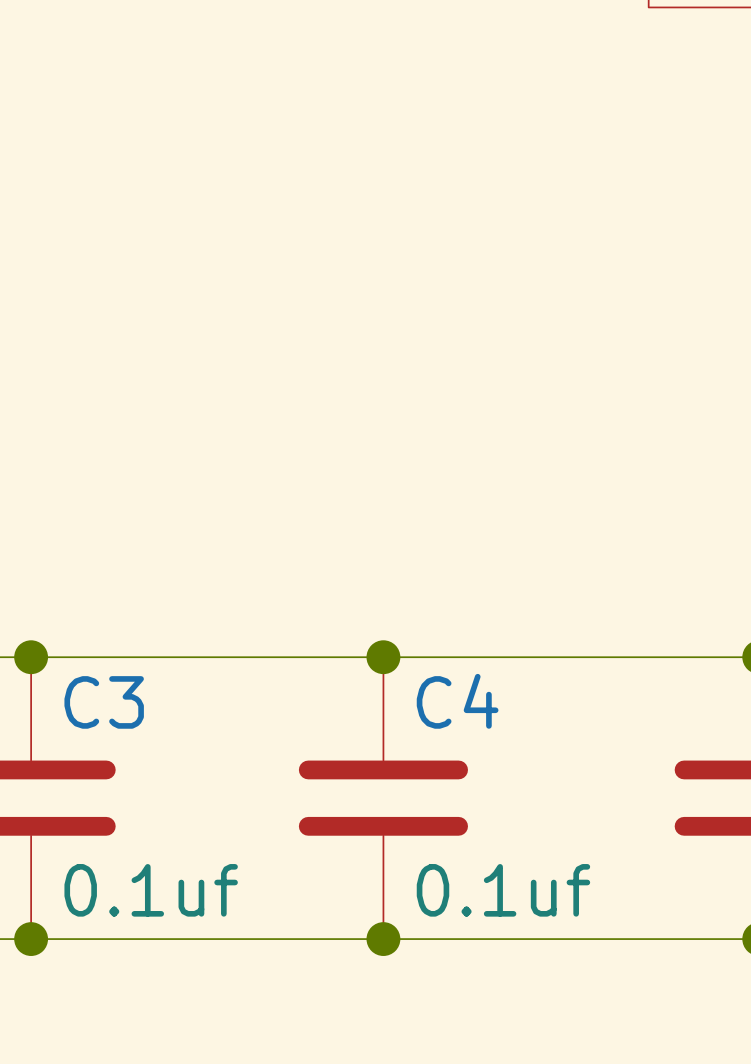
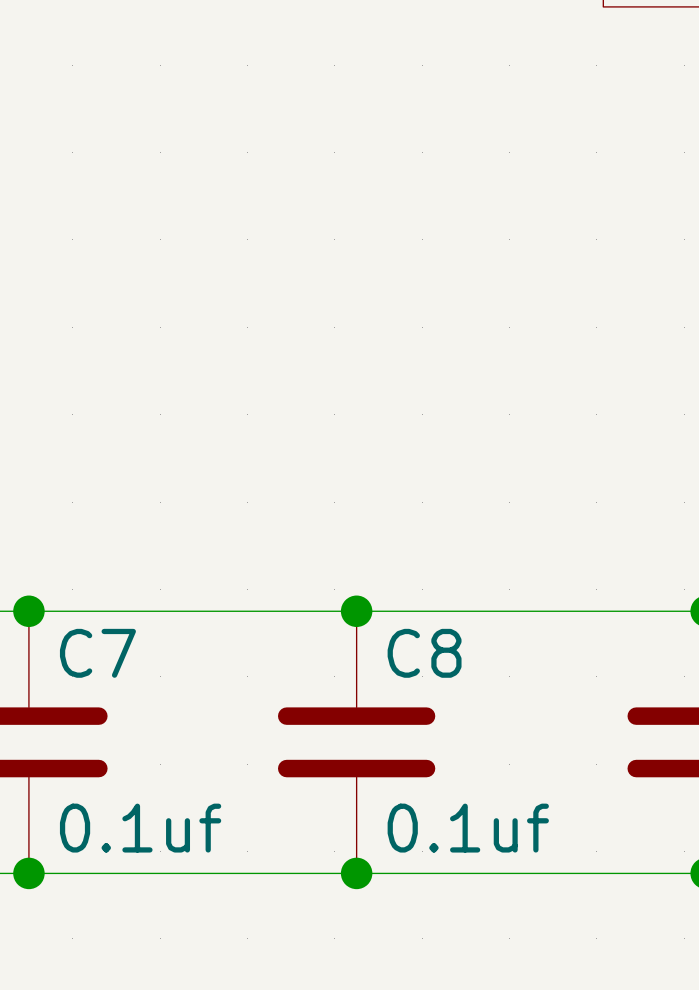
C4 name: C4 (457, 701) -> C8 (424, 653)
C3 name: C3 (104, 702) -> C7 (97, 653)

